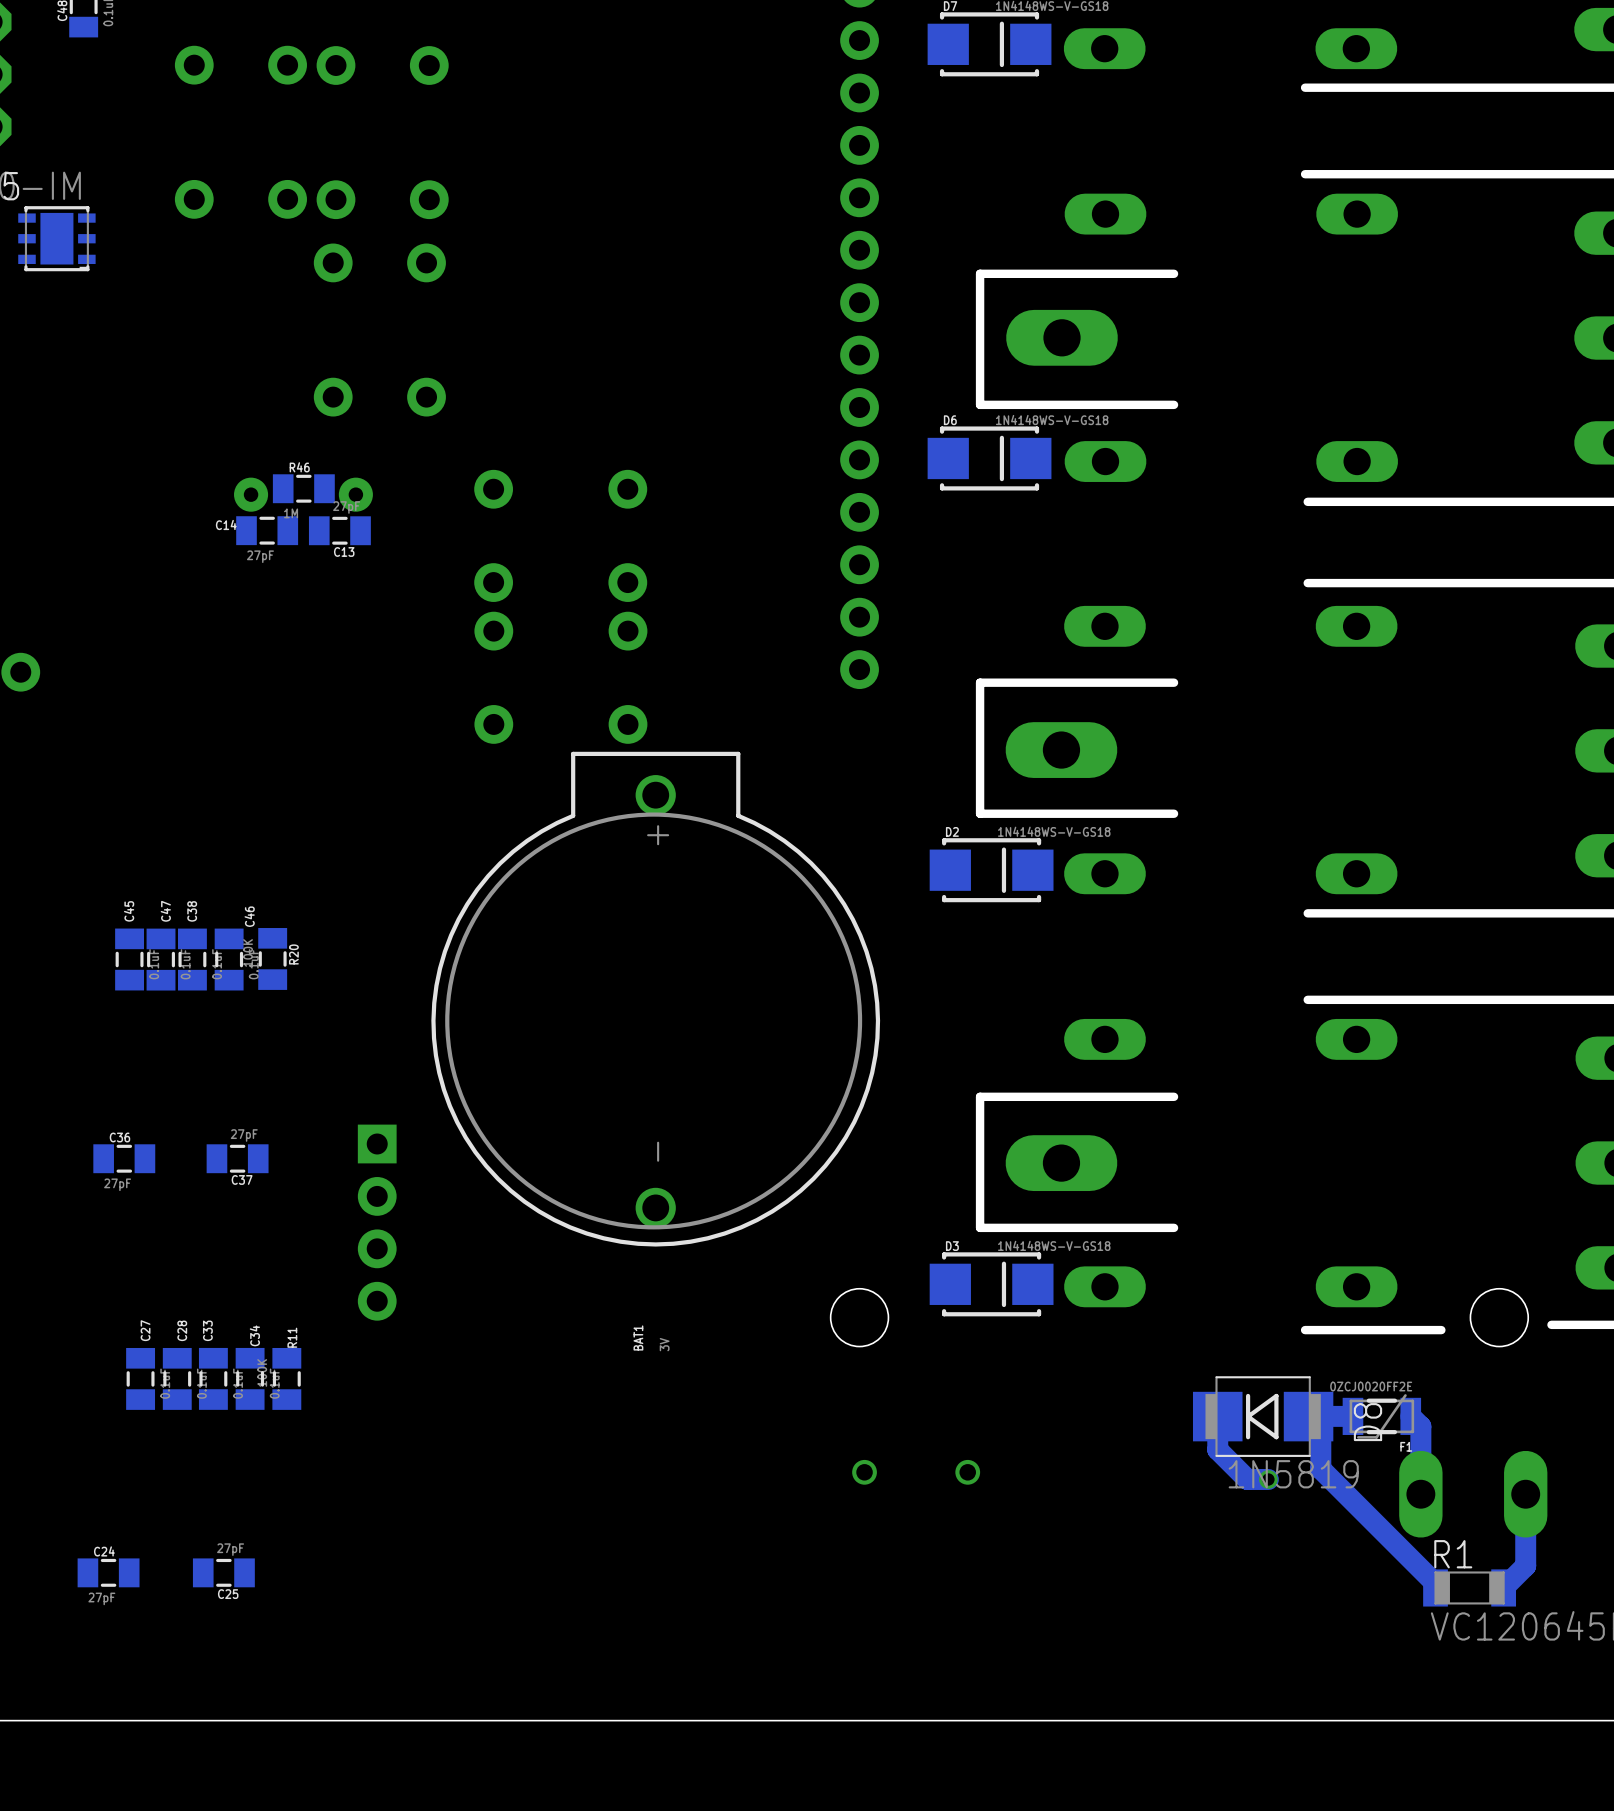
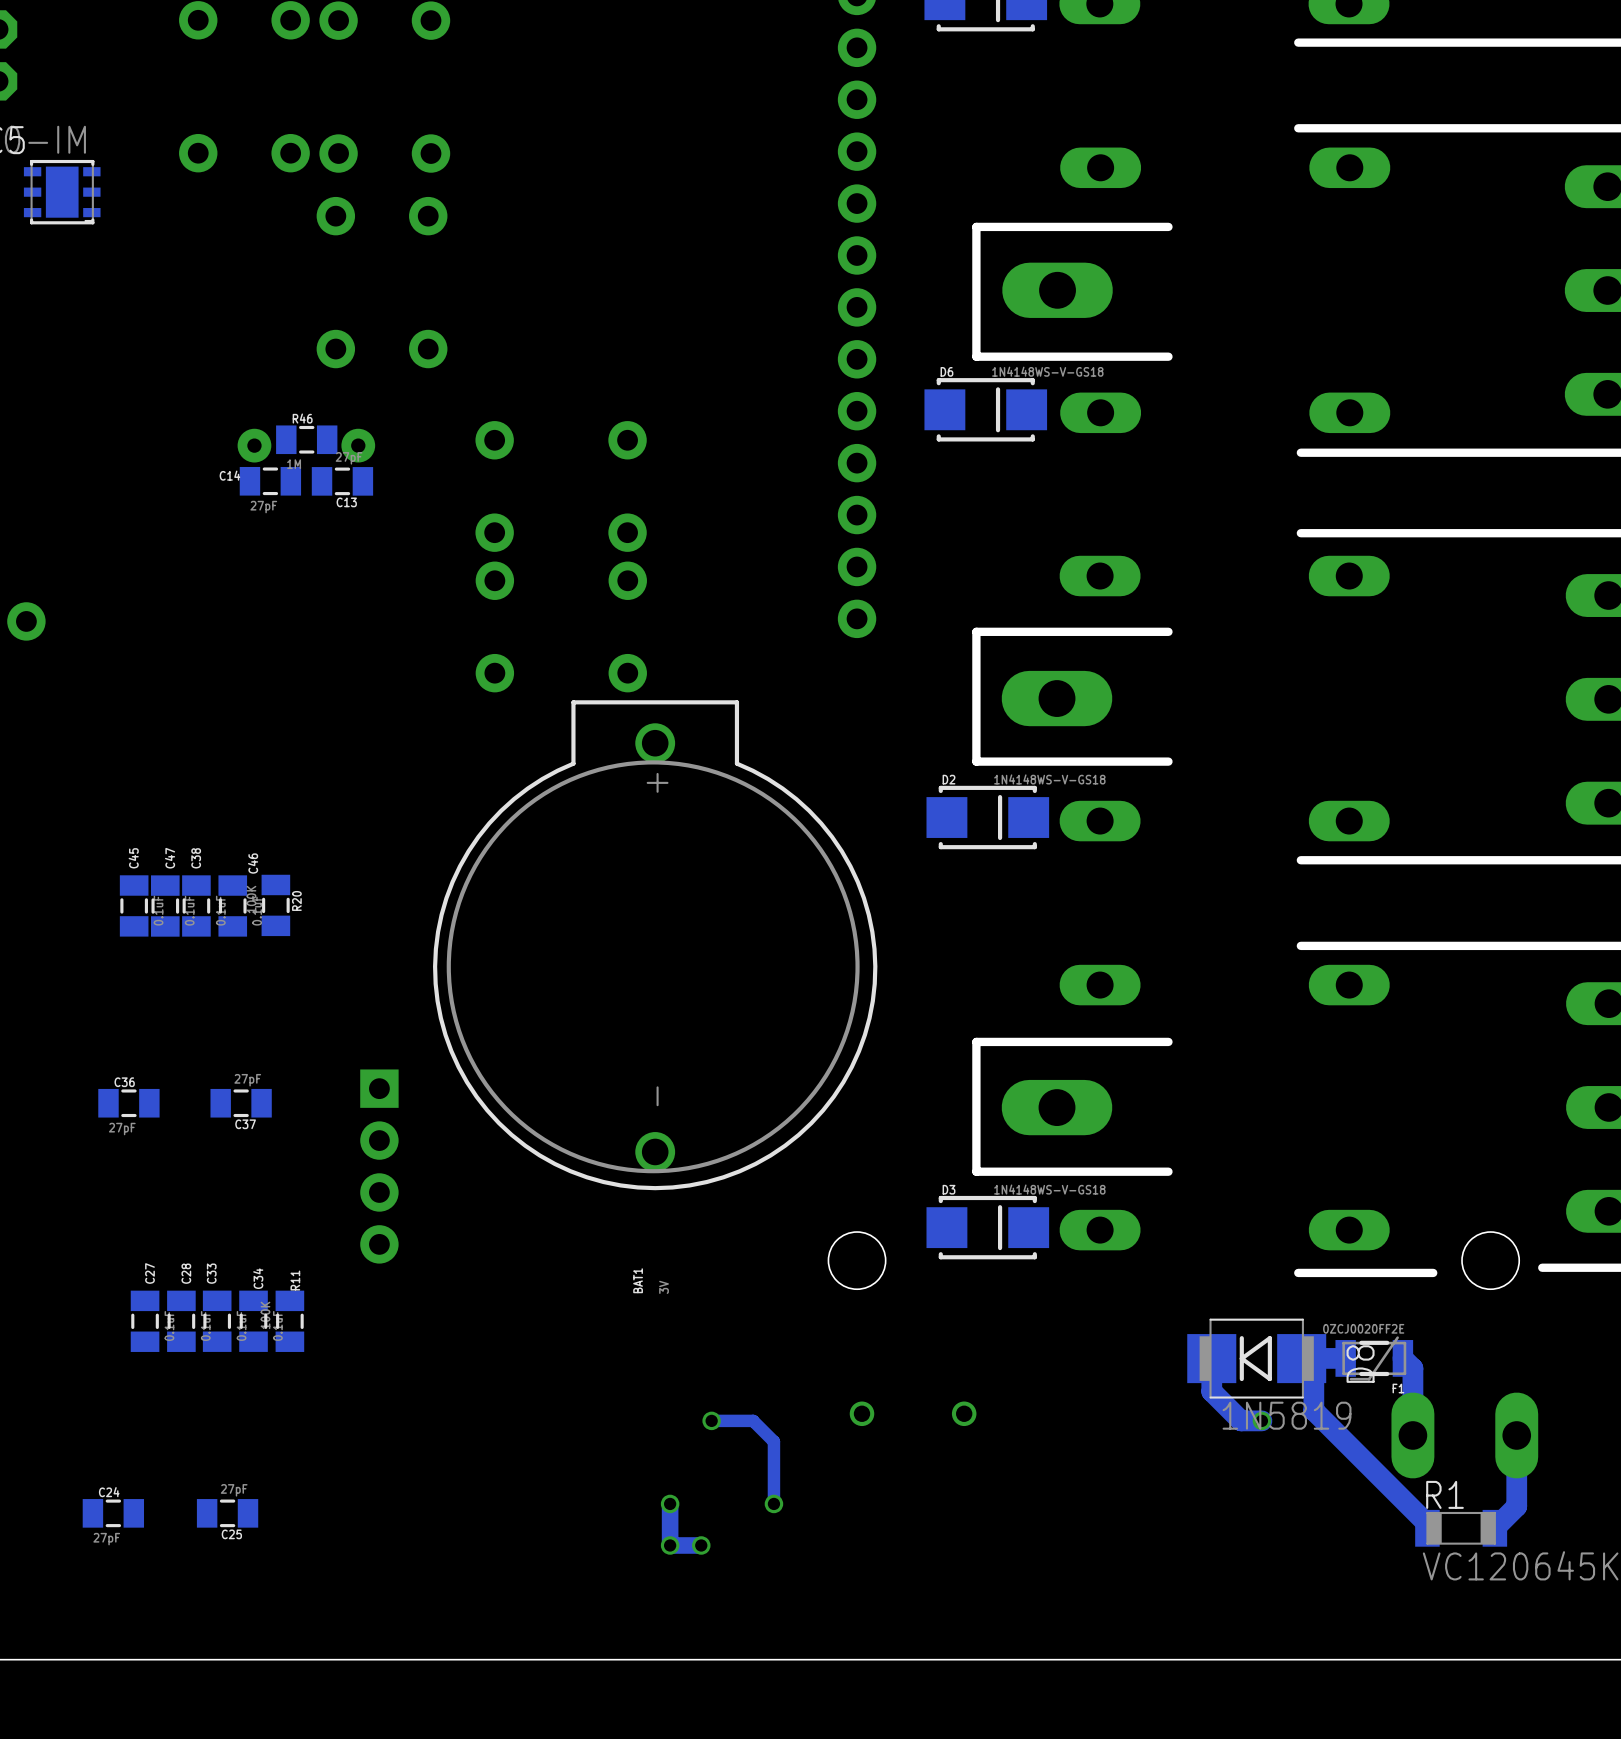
track: none -> (711, 1420) (753, 1420) (773, 1441) (773, 1503)
via: none -> (711, 1420)
track: none -> (670, 1503) (670, 1545) (701, 1545)
via: none -> (670, 1503)
via: none -> (773, 1503)
via: none -> (670, 1545)
via: none -> (701, 1545)

